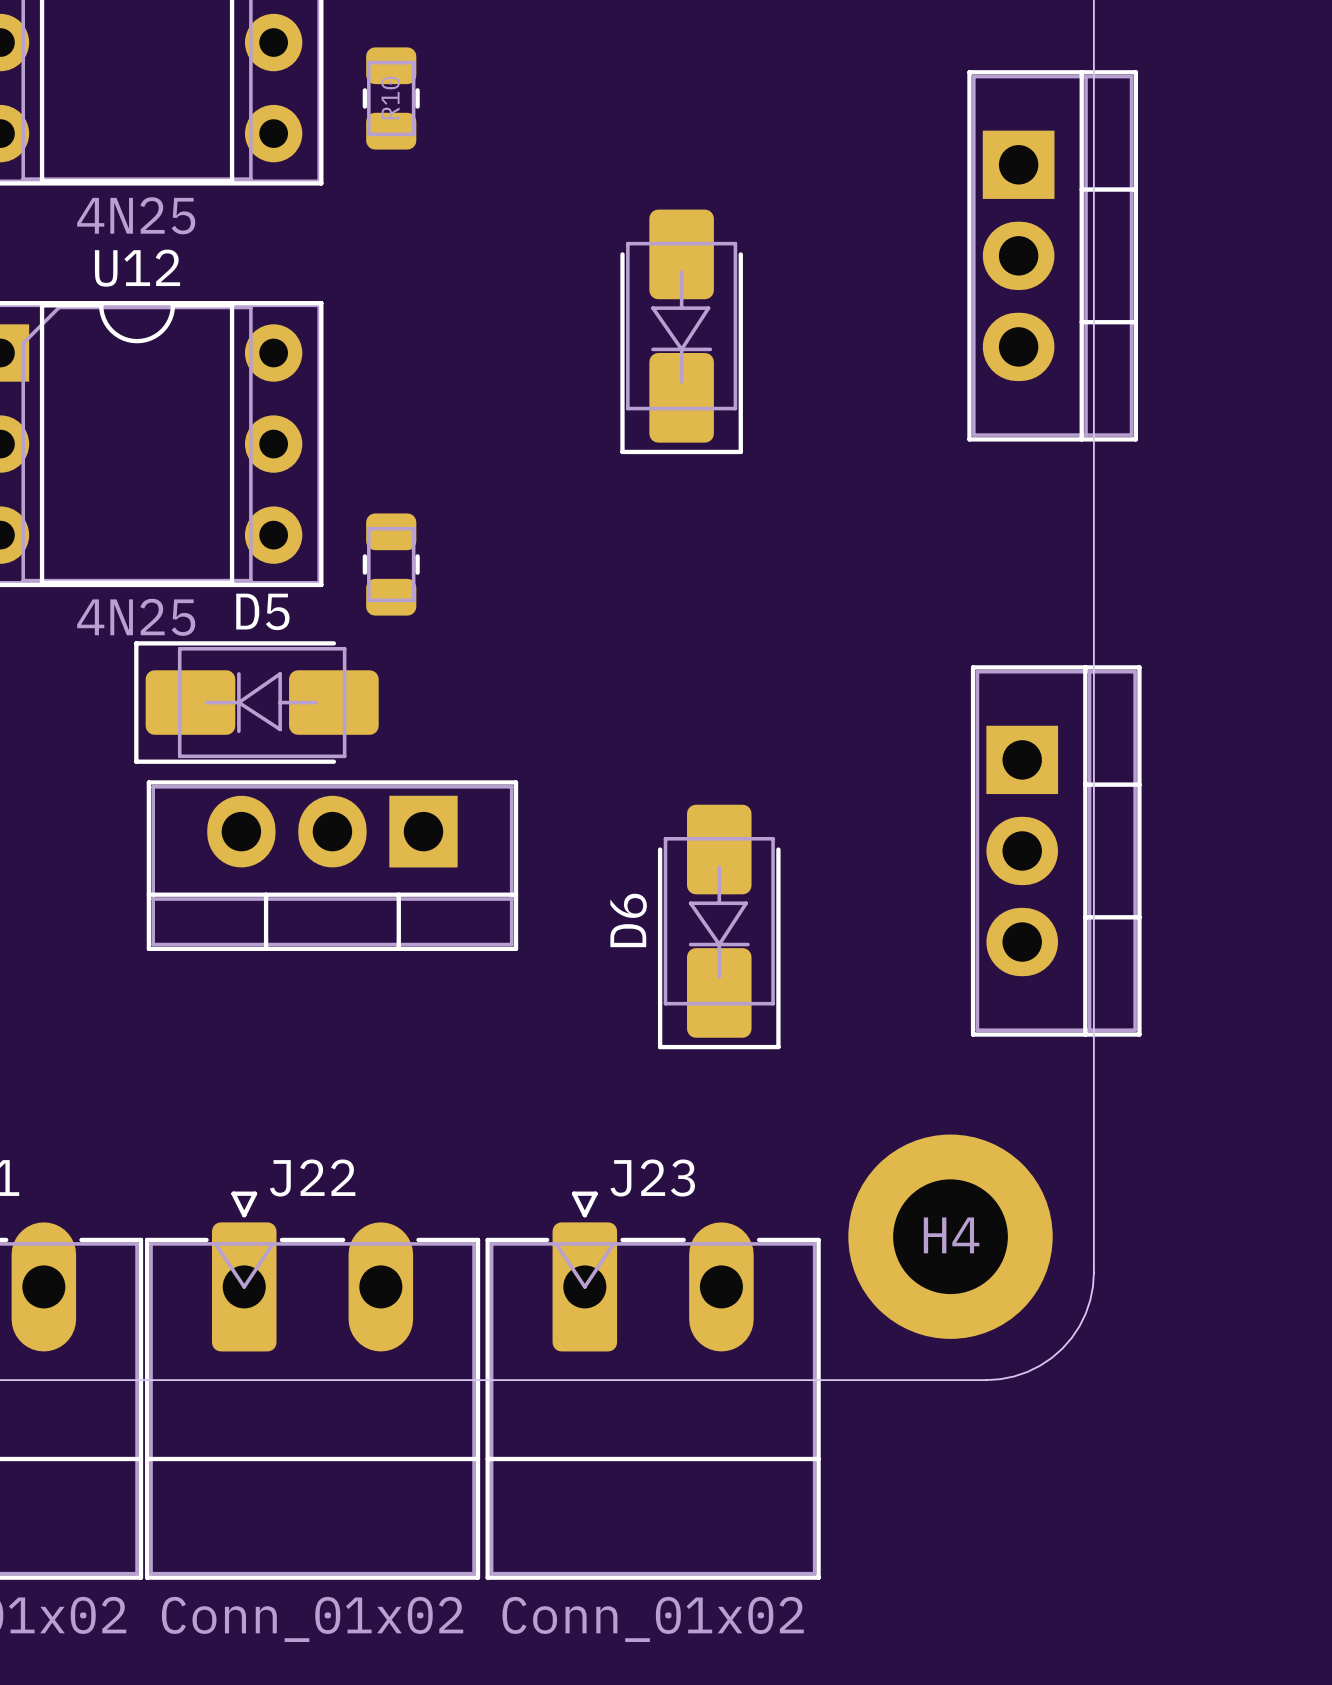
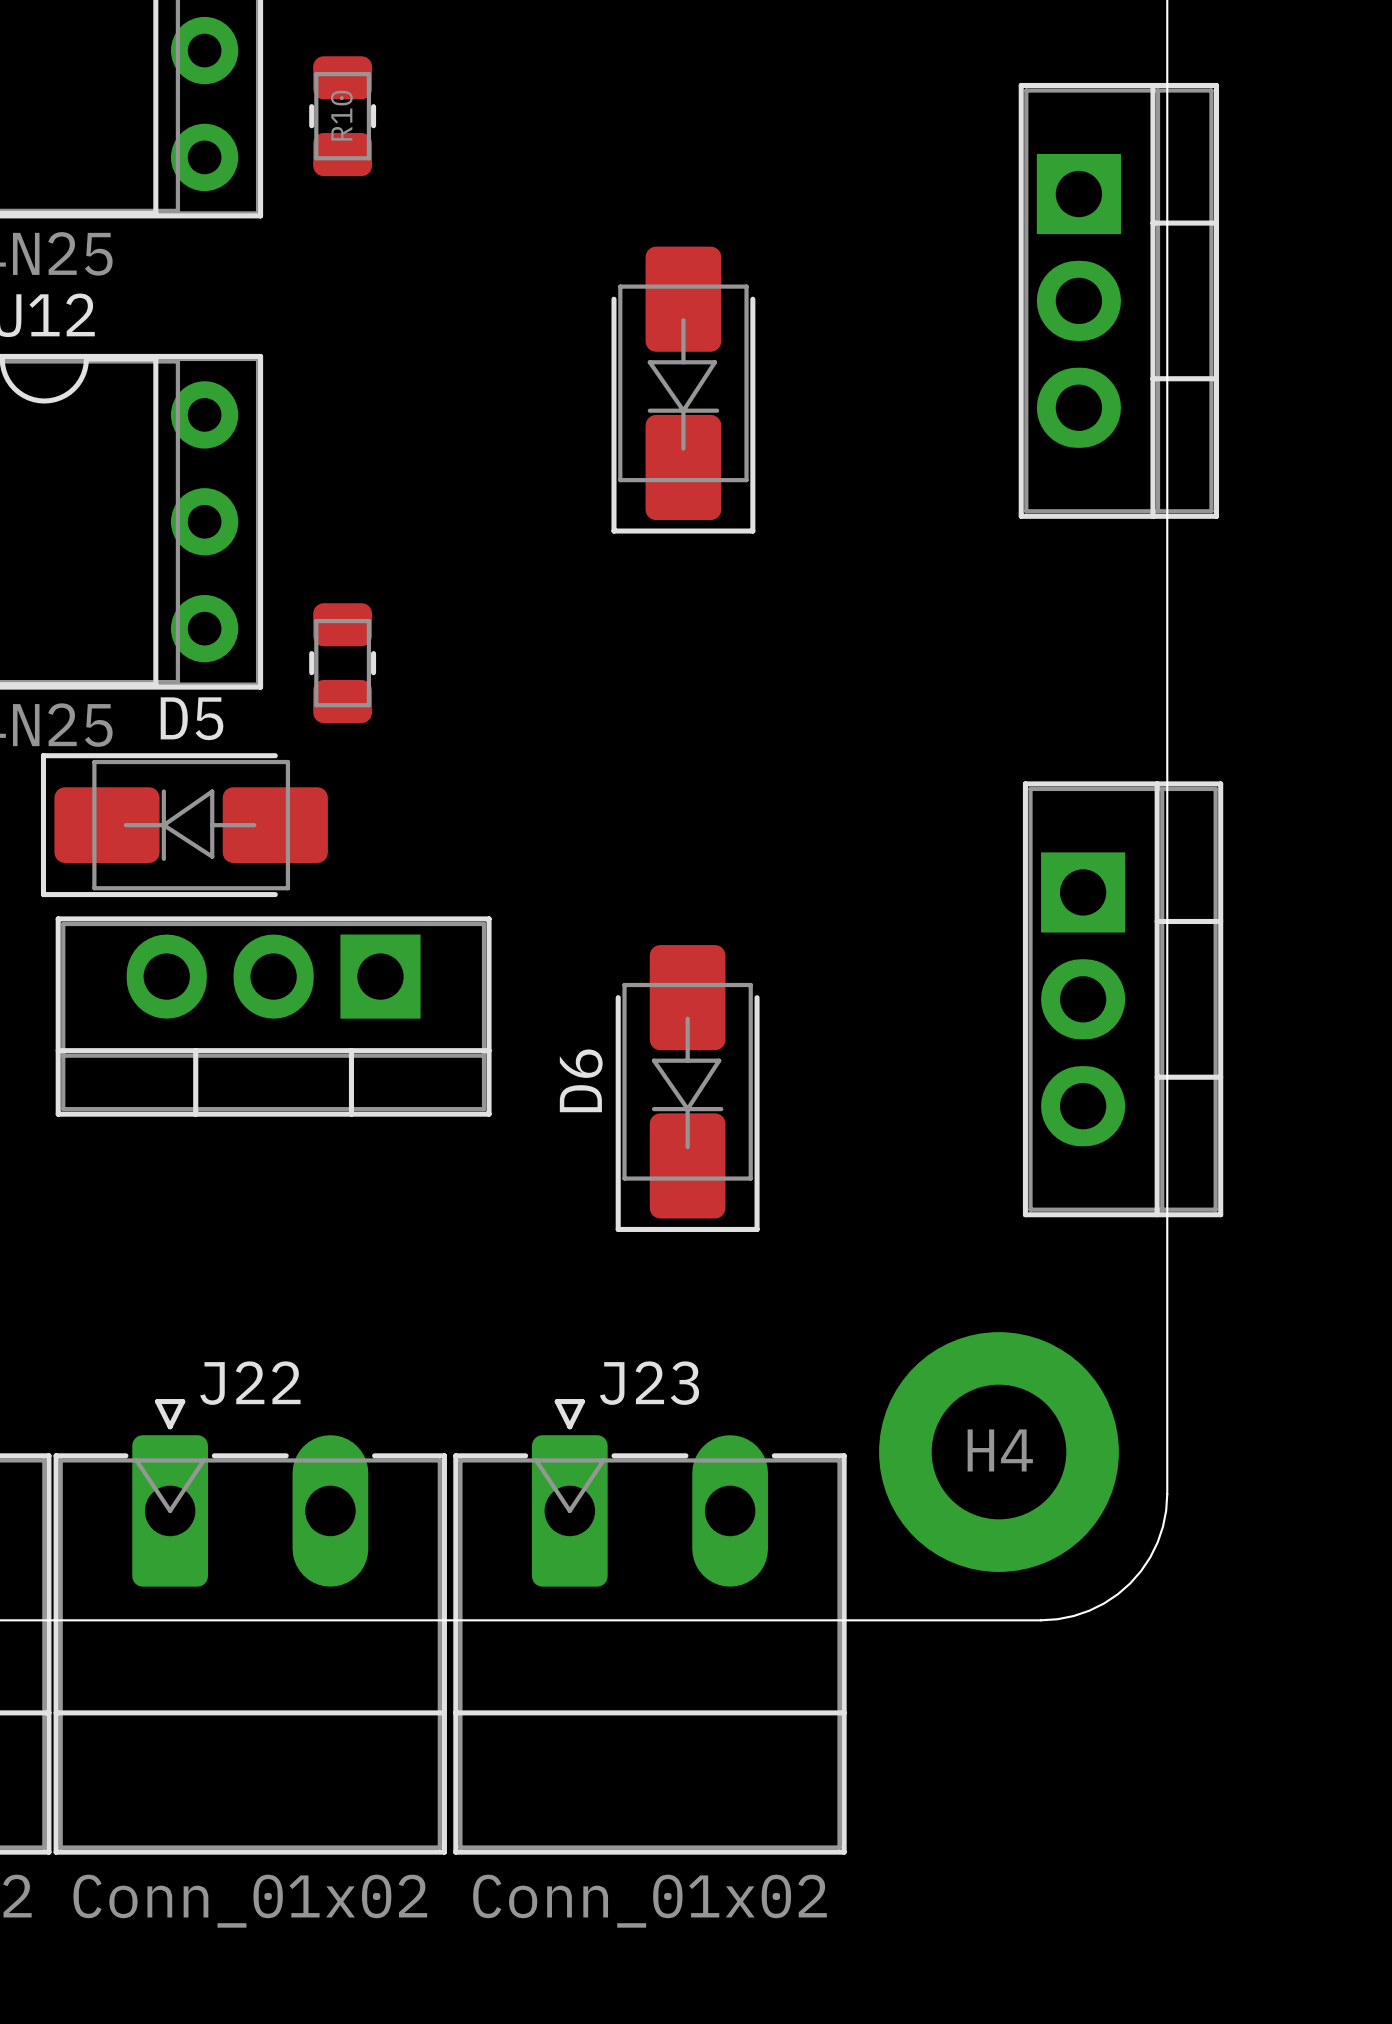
D6 position: (719, 926) -> (687, 1088)

